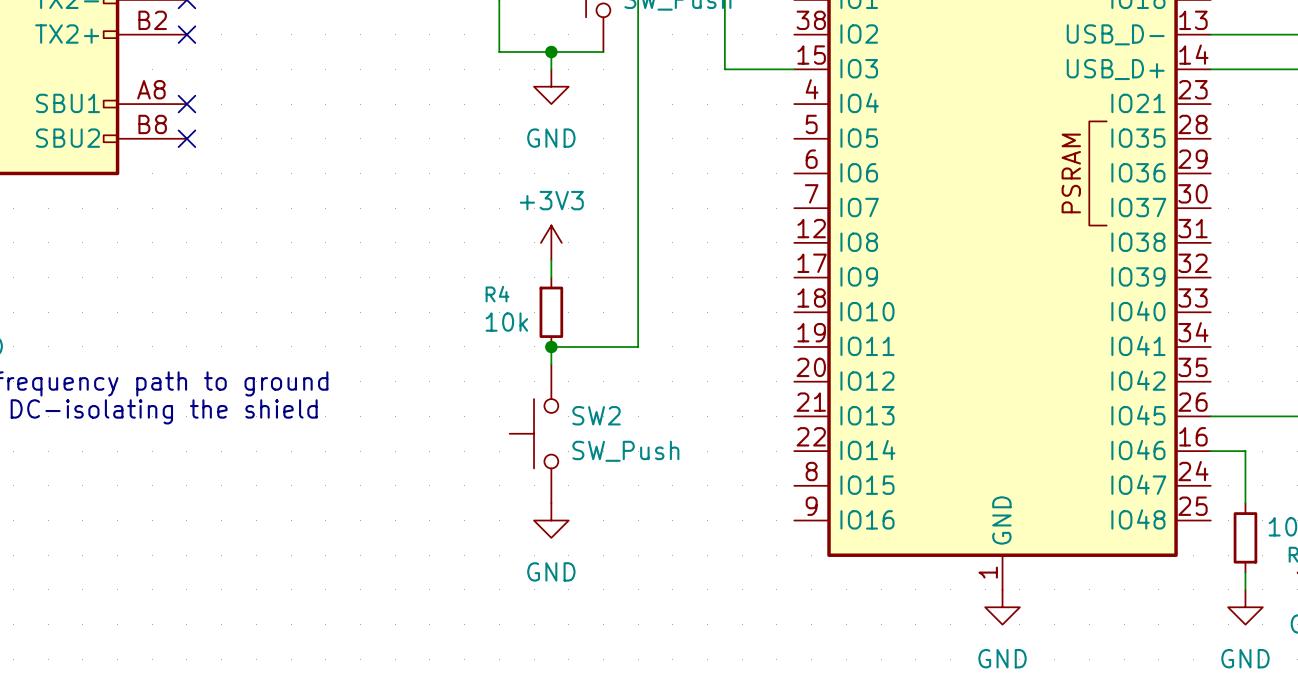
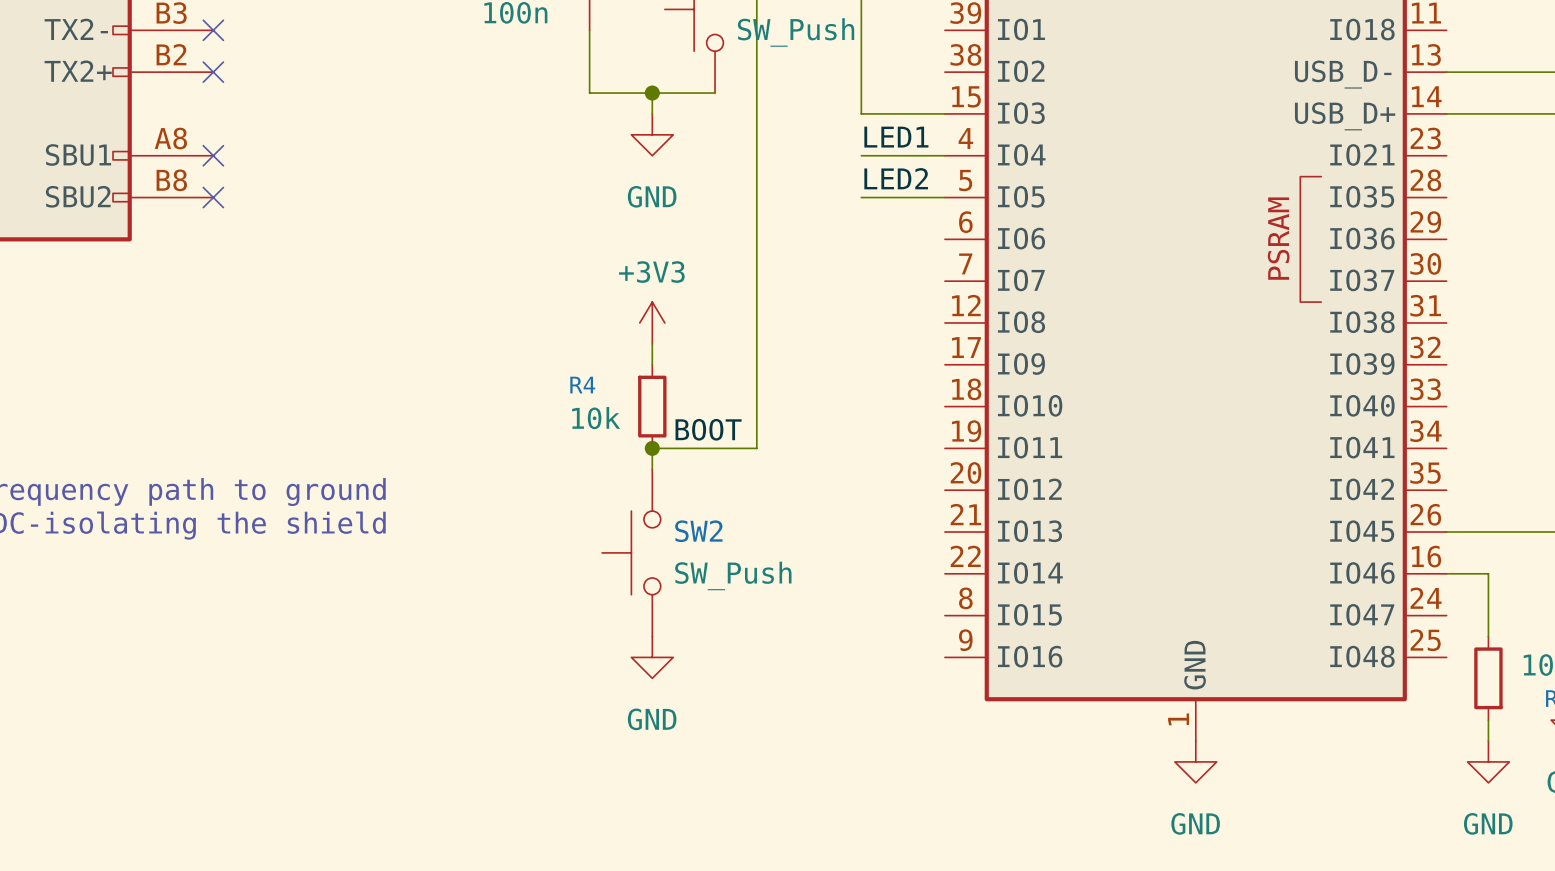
label: none -> LED1 (896, 137)
wire: none -> (861, 155) (944, 155)
label: none -> LED2 (896, 178)
wire: none -> (861, 197) (944, 197)
label: none -> BOOT (708, 429)

